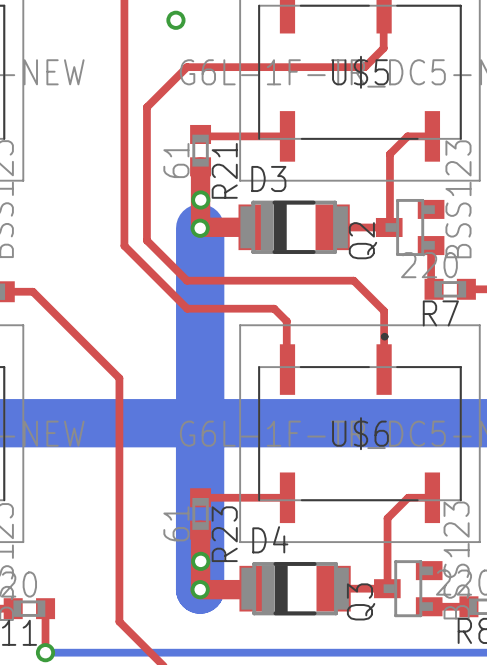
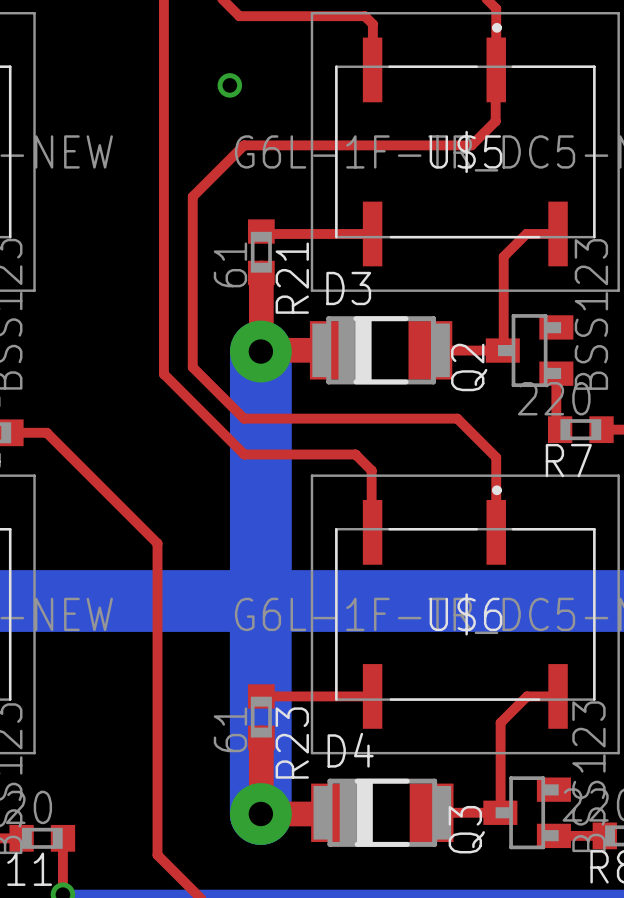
via: (200, 200) -> none
via size: [190, 218, 210, 238] -> [229, 320, 292, 383]
via: (200, 561) -> none
via size: [190, 580, 210, 600] -> [229, 783, 292, 845]

